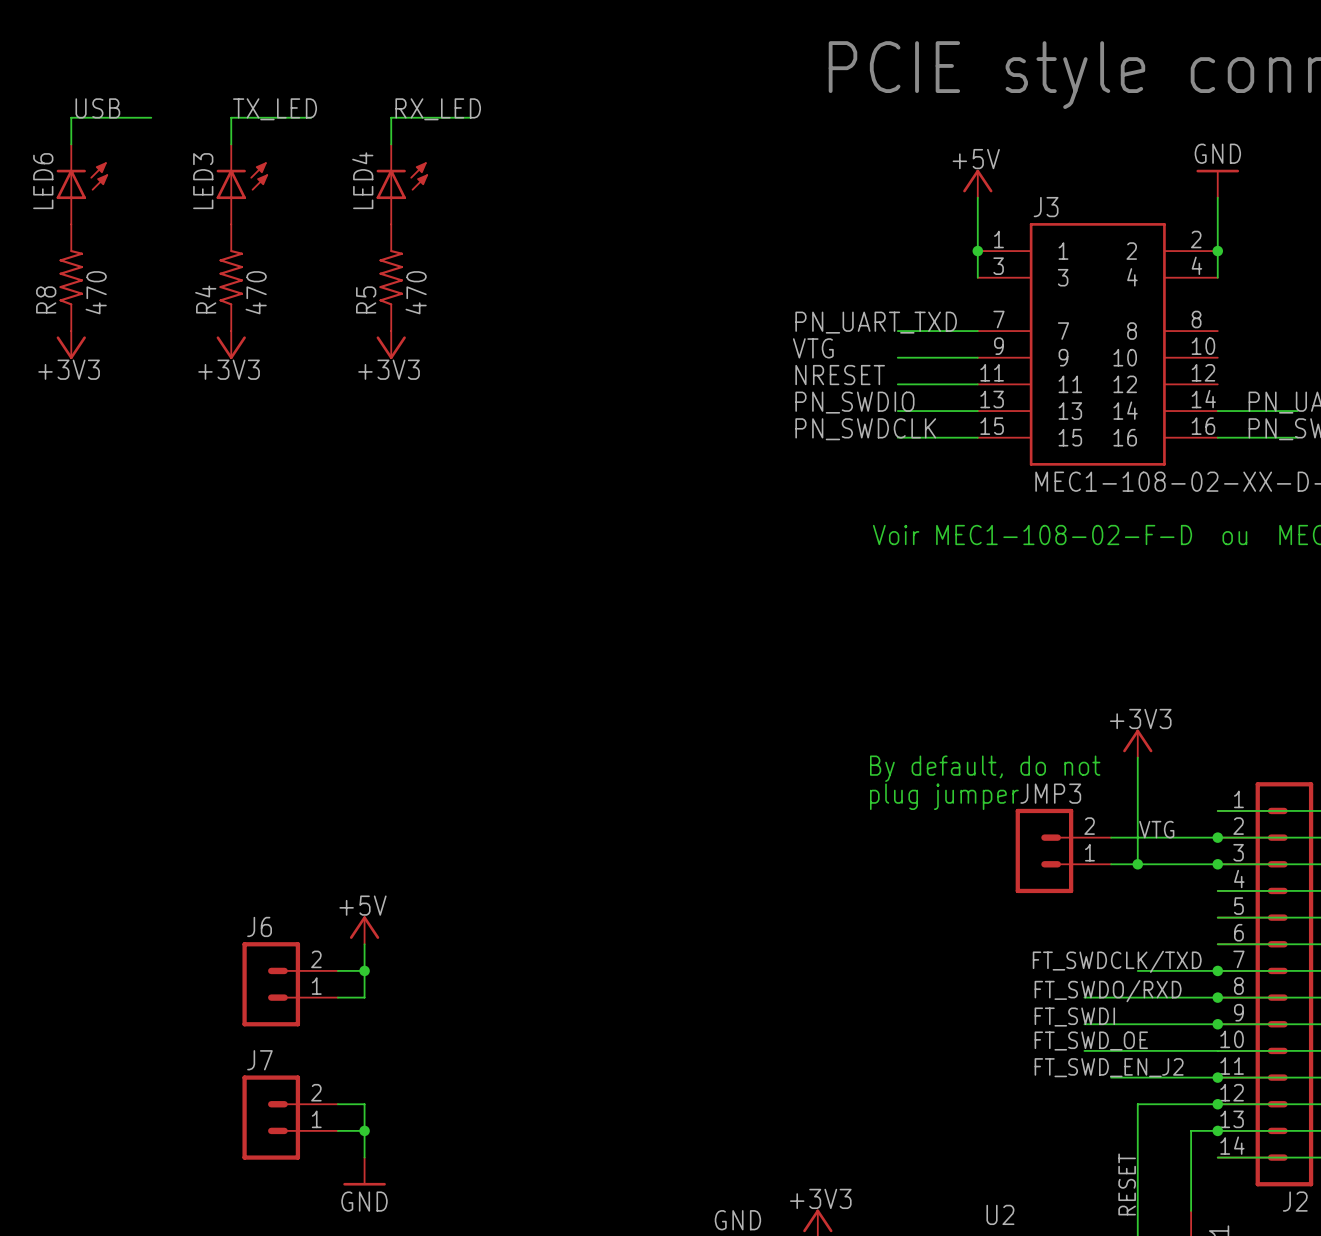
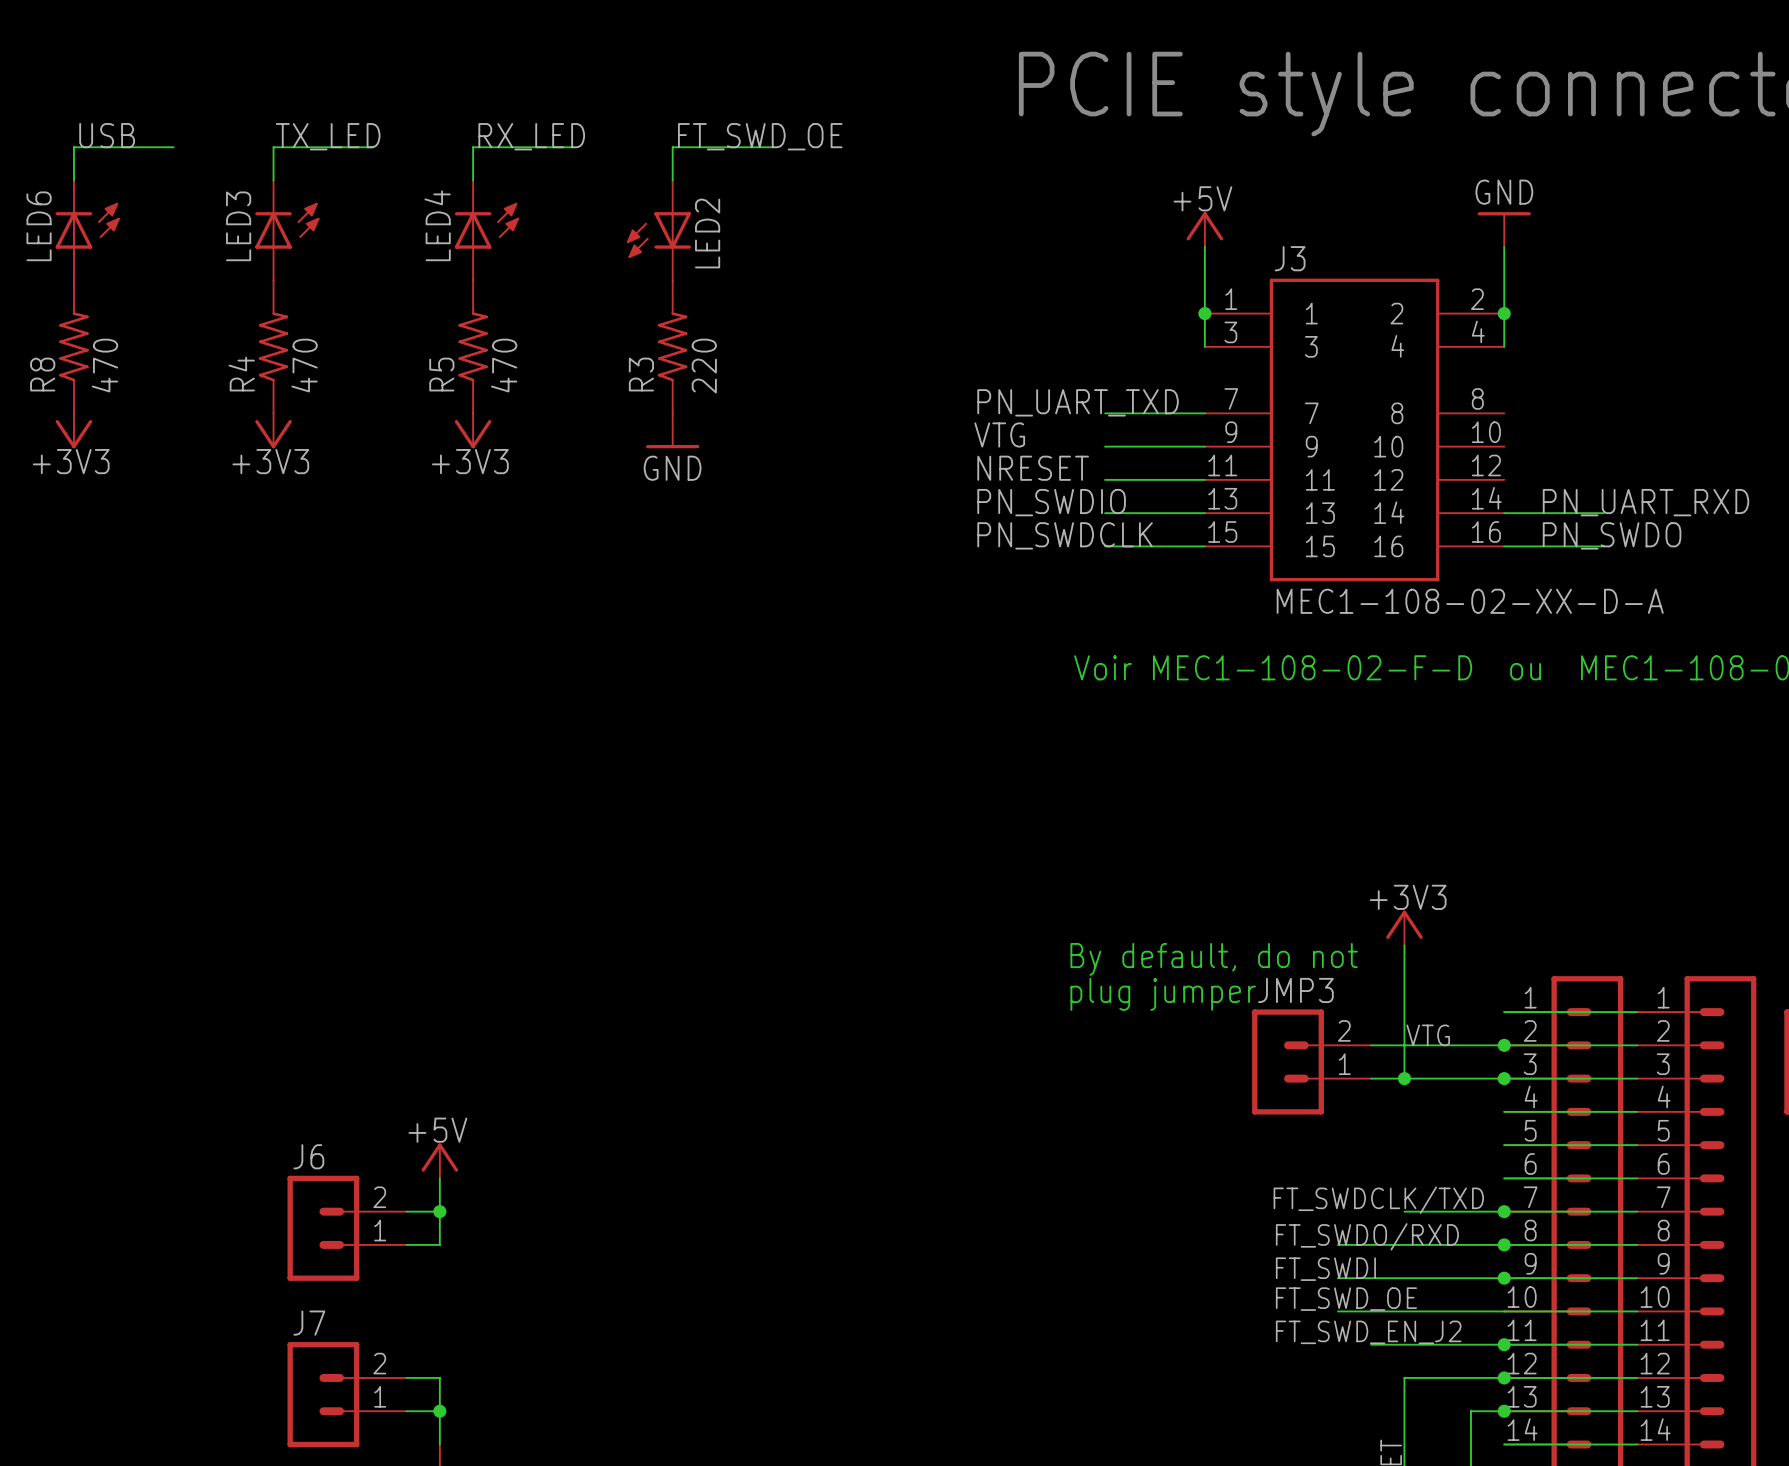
label: none -> FT_SWD_OE (760, 136)
wire: none -> (772, 147) (672, 147) (672, 180)
LED2: none -> (658, 230)
R3: none -> 220 (672, 346)
power symbol: none -> GND (672, 430)

